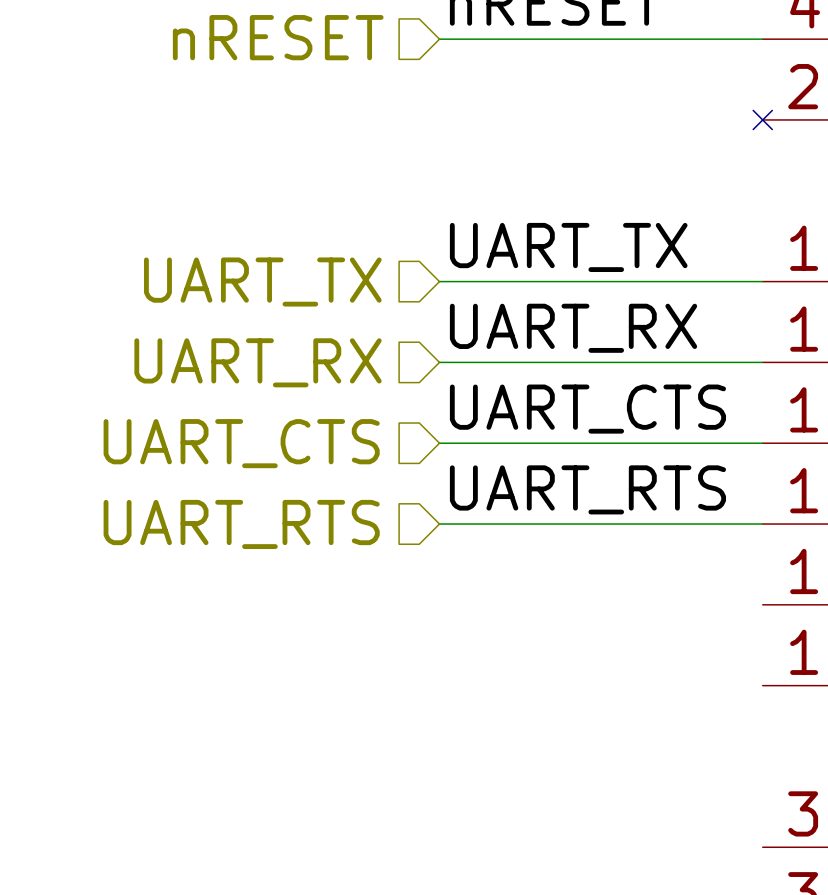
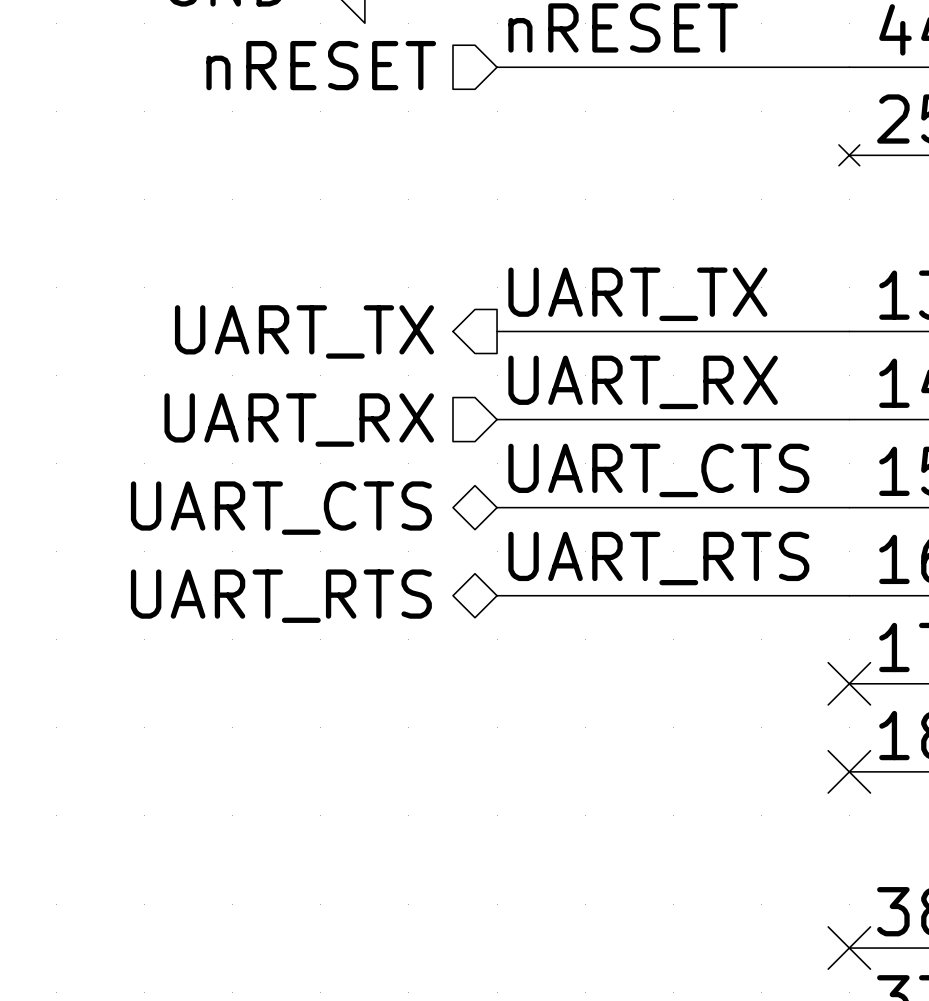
hierarchical label shape: input (262, 282) -> output (304, 331)
hierarchical label shape: input (241, 443) -> bidirectional (281, 508)
hierarchical label shape: input (241, 524) -> bidirectional (281, 596)
no-connect mark: none -> (849, 683)
no-connect mark: none -> (849, 771)
no-connect mark: none -> (849, 948)

